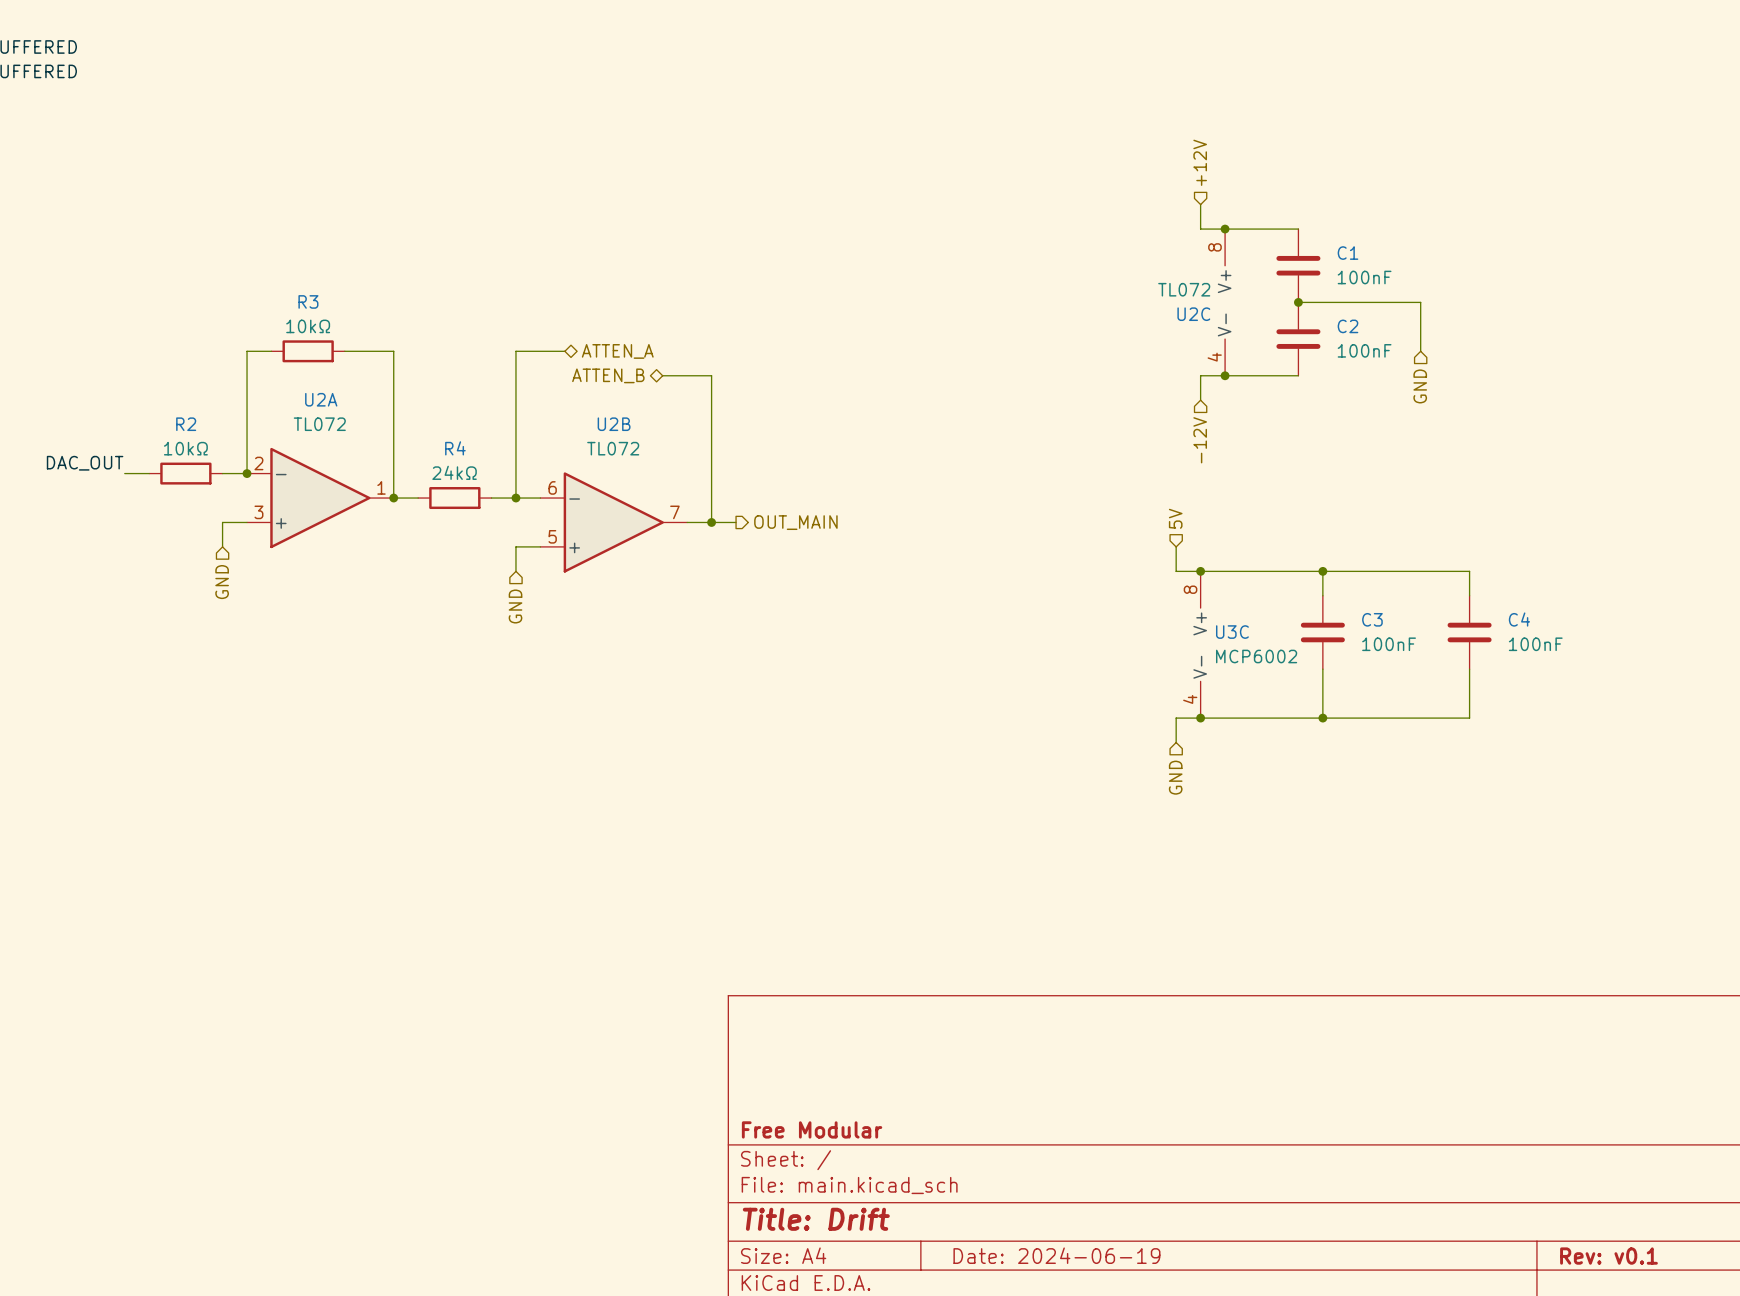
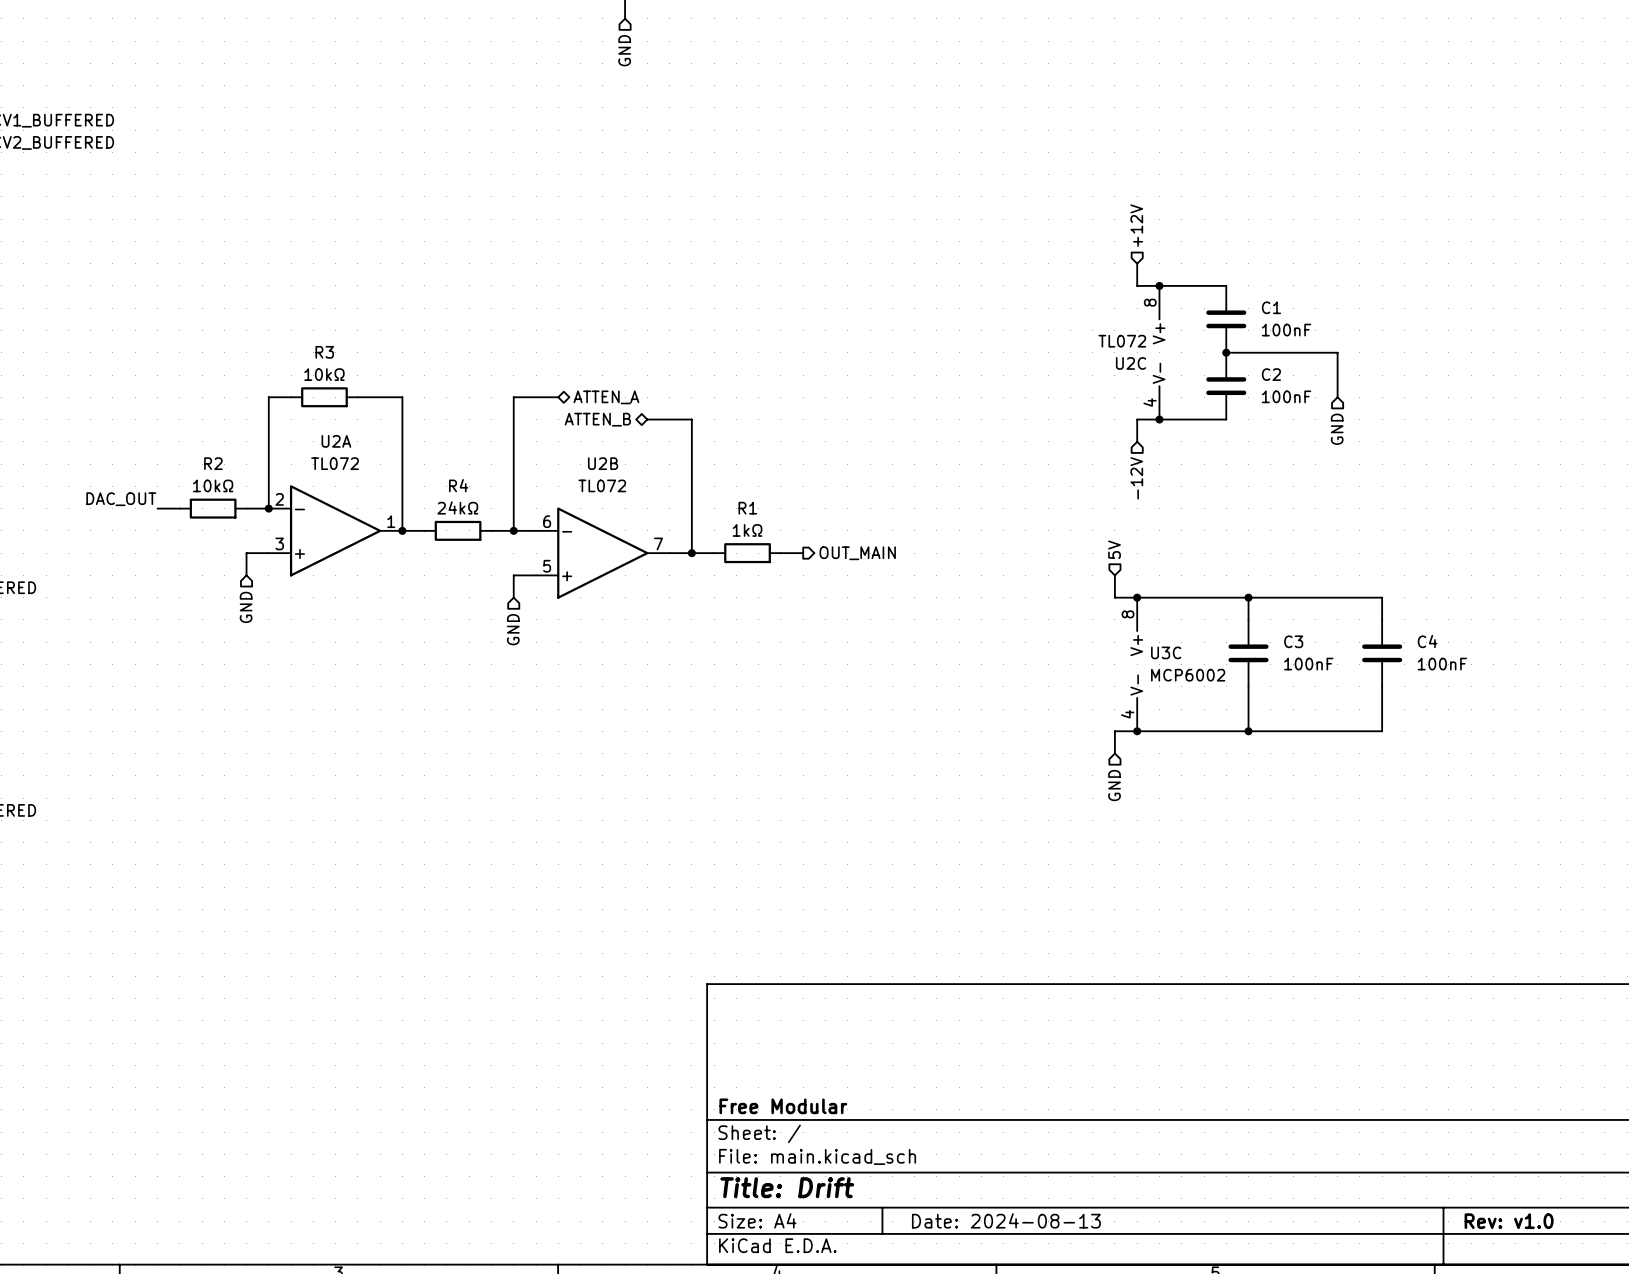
R1: none -> 1kΩ (747, 553)
hierarchical label position: OUT_MAIN (795, 522) -> OUT_MAIN (857, 553)
wire: none -> (780, 553) (803, 553)
title block: Date: 2024-06-19 (1056, 1255) -> Date: 2024-08-13 (1006, 1220)
title block: Rev: v0.1 (1609, 1256) -> Rev: v1.0 (1509, 1221)

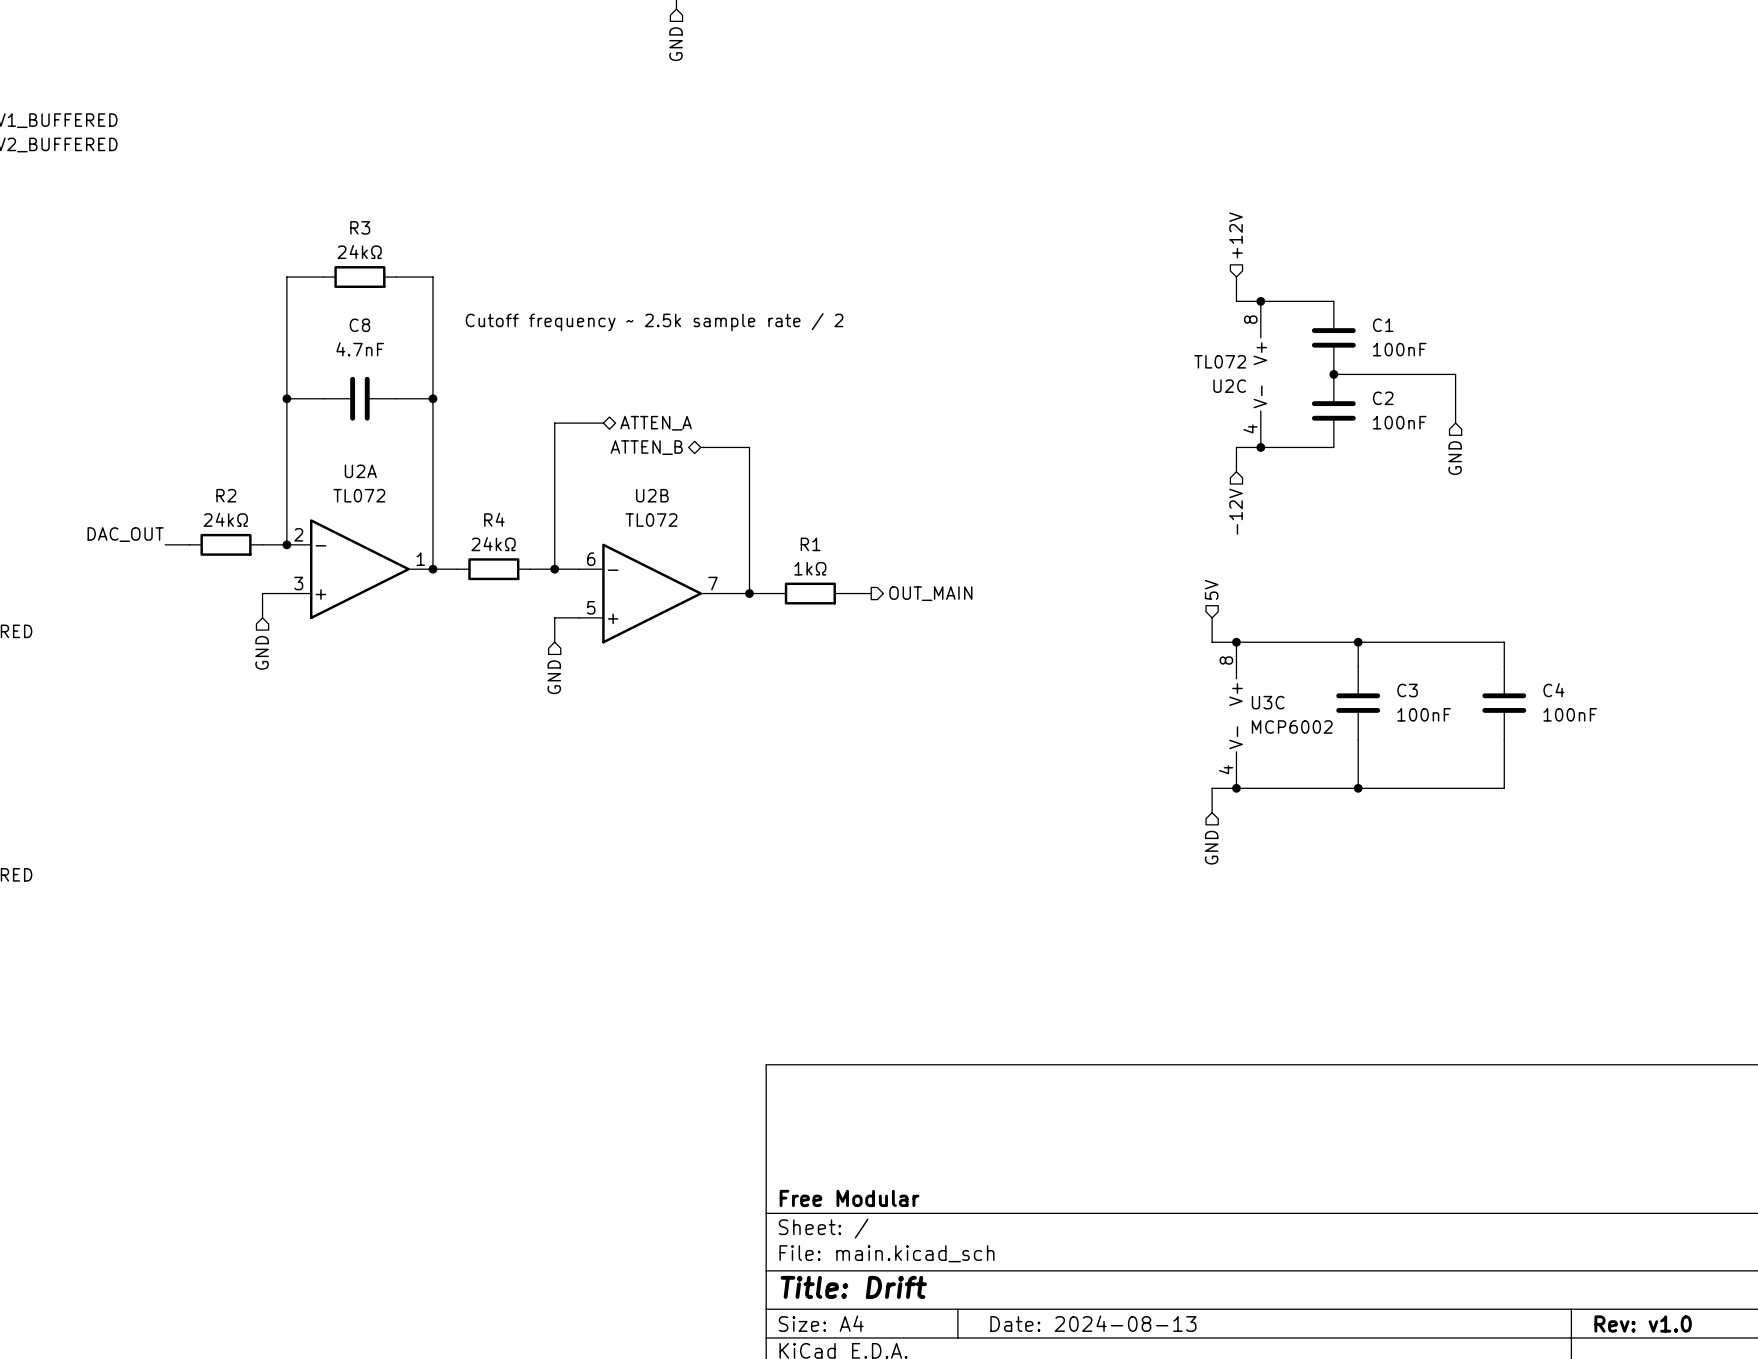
text: none -> Cutoff frequency ~ 2.5k sample rate / 2 (654, 322)
R3 value: 10kΩ (324, 374) -> 24kΩ (359, 251)
wire: none -> (286, 398) (323, 398)
junction: none -> (286, 398)
C8: none -> 4.7nF (359, 398)
wire: none -> (396, 398) (432, 398)
junction: none -> (432, 398)
wire: (268, 397) (291, 397) -> (286, 423) (286, 277) (323, 277)
R3 position: (324, 397) -> (359, 277)
wire: (357, 397) (402, 397) -> (396, 277) (432, 277) (432, 423)
R2 value: 10kΩ (213, 485) -> 24kΩ (225, 519)

